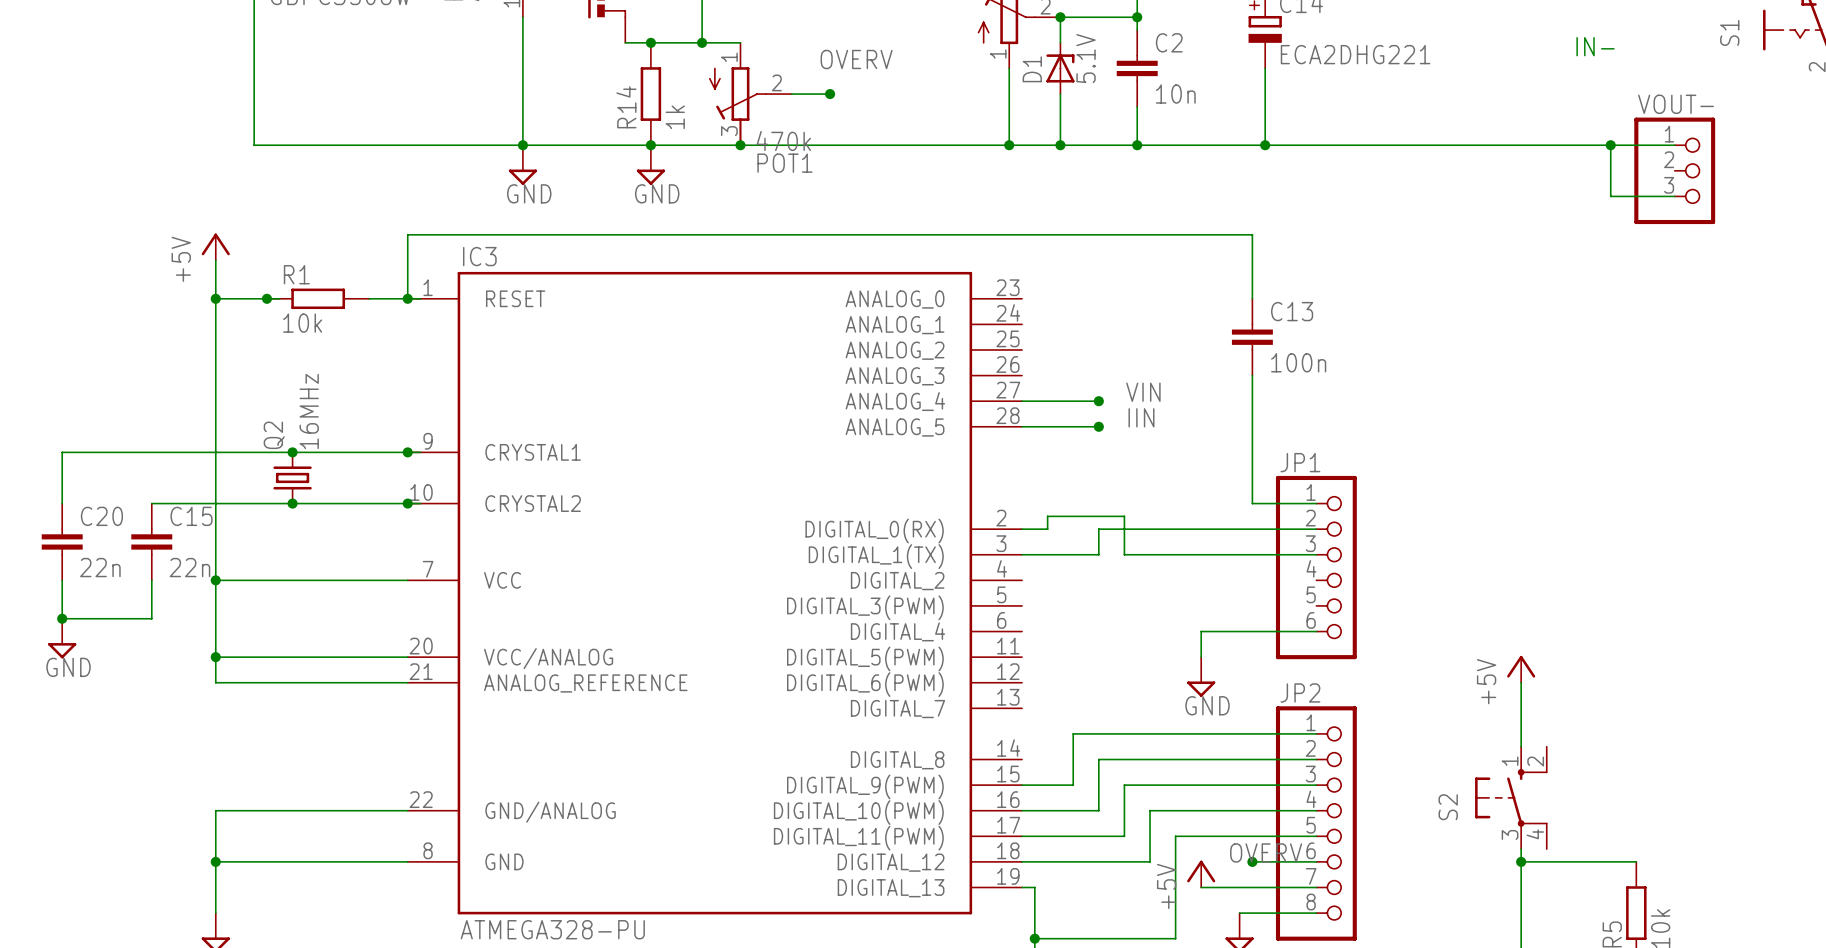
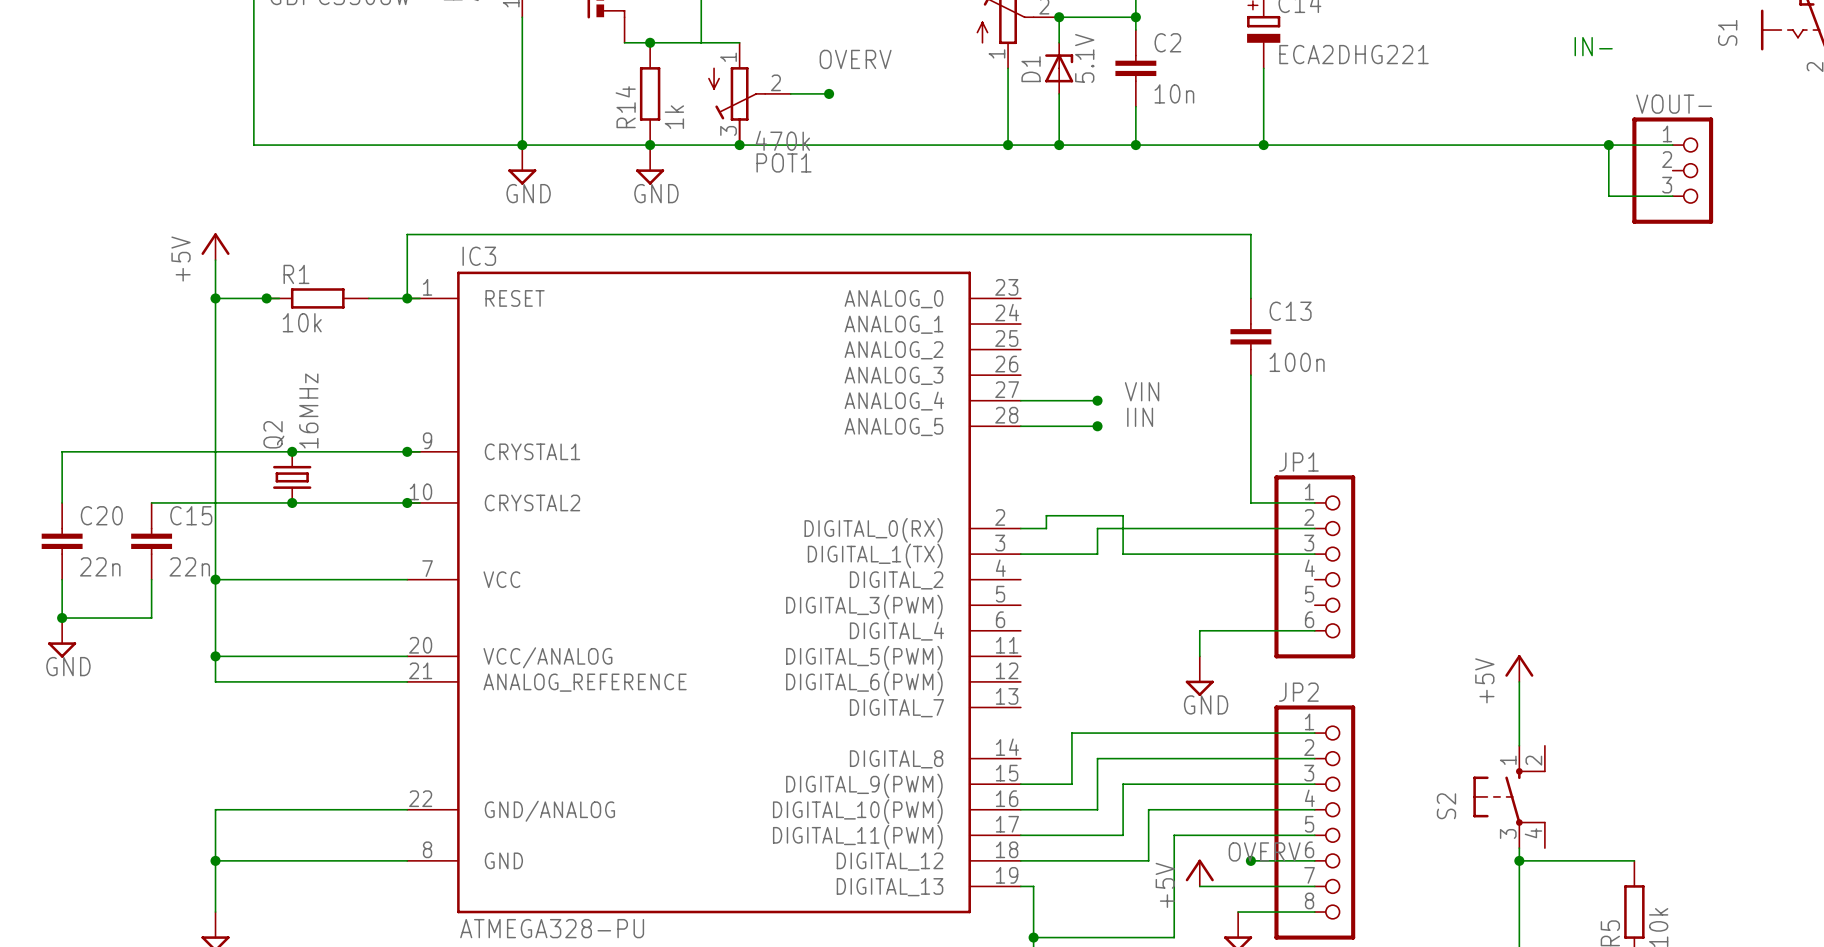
junction: (702, 42) -> none

